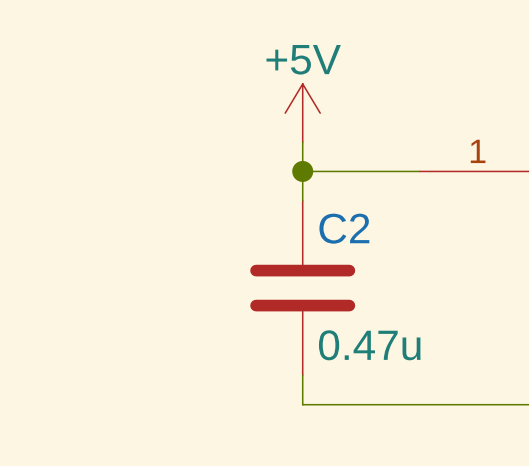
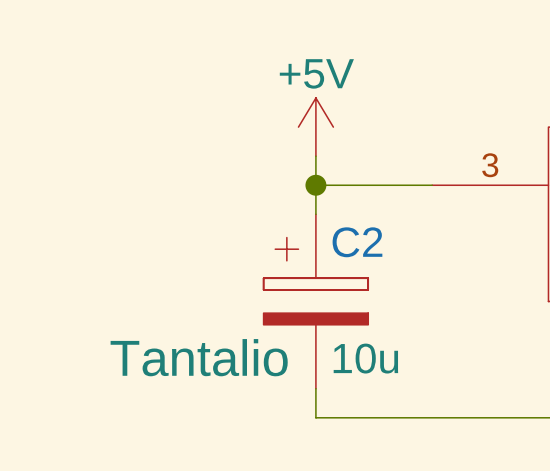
part pin number: 1 (478, 151) -> 3 (490, 165)
C2 symbol: [250, 200, 356, 376] -> [263, 214, 369, 389]
C2 text: none -> Tantalio (199, 357)
C2 value: 0.47u (369, 345) -> 10u (365, 358)

